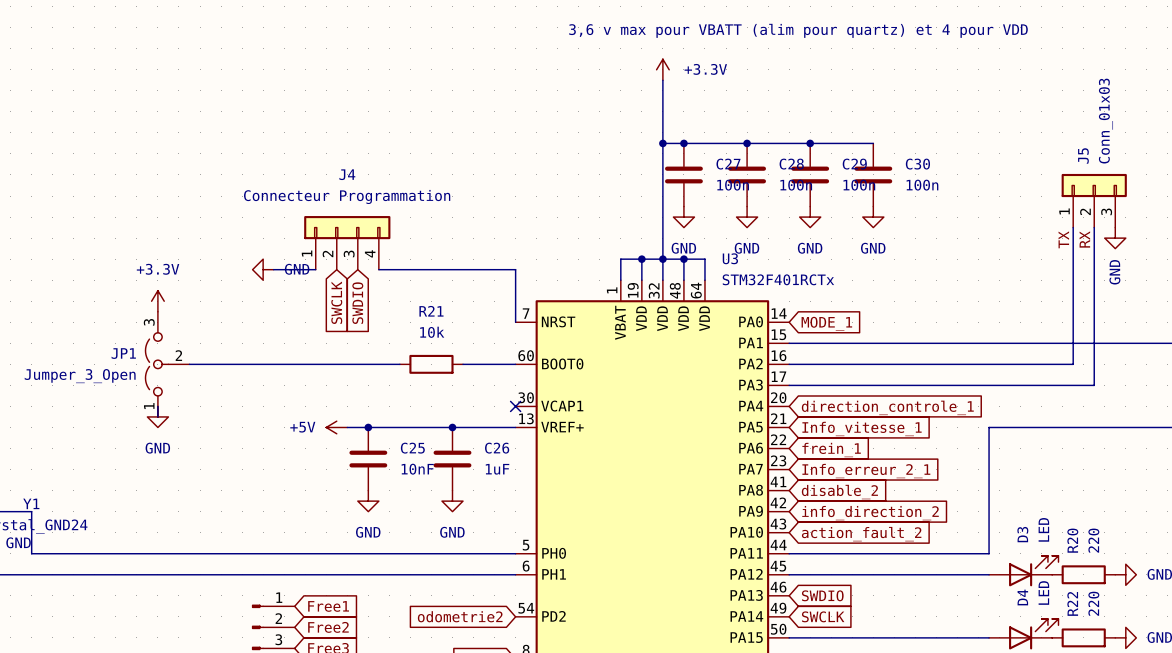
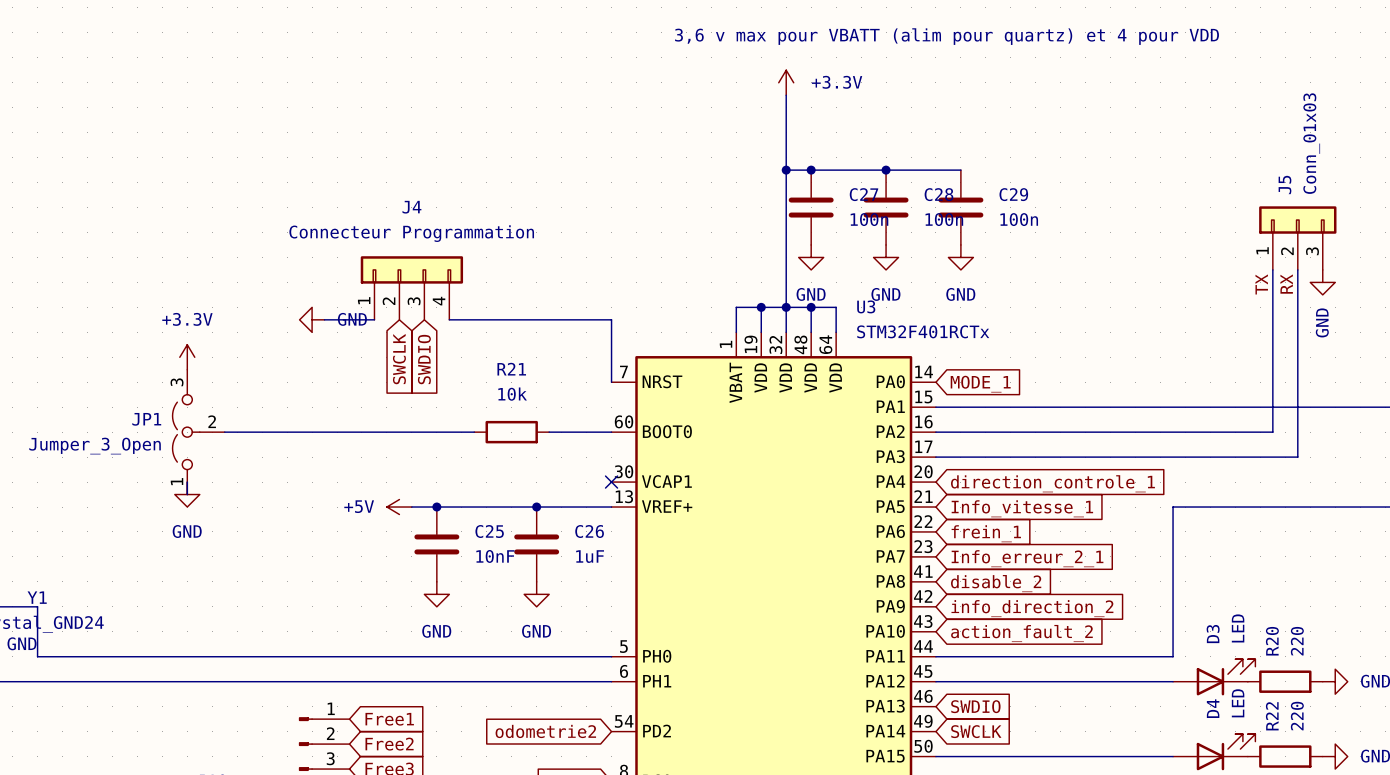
wire: (810, 143) (873, 143) -> none
junction: (810, 143) -> none
C30: 100n (873, 174) -> none
power symbol: GND (873, 217) -> none

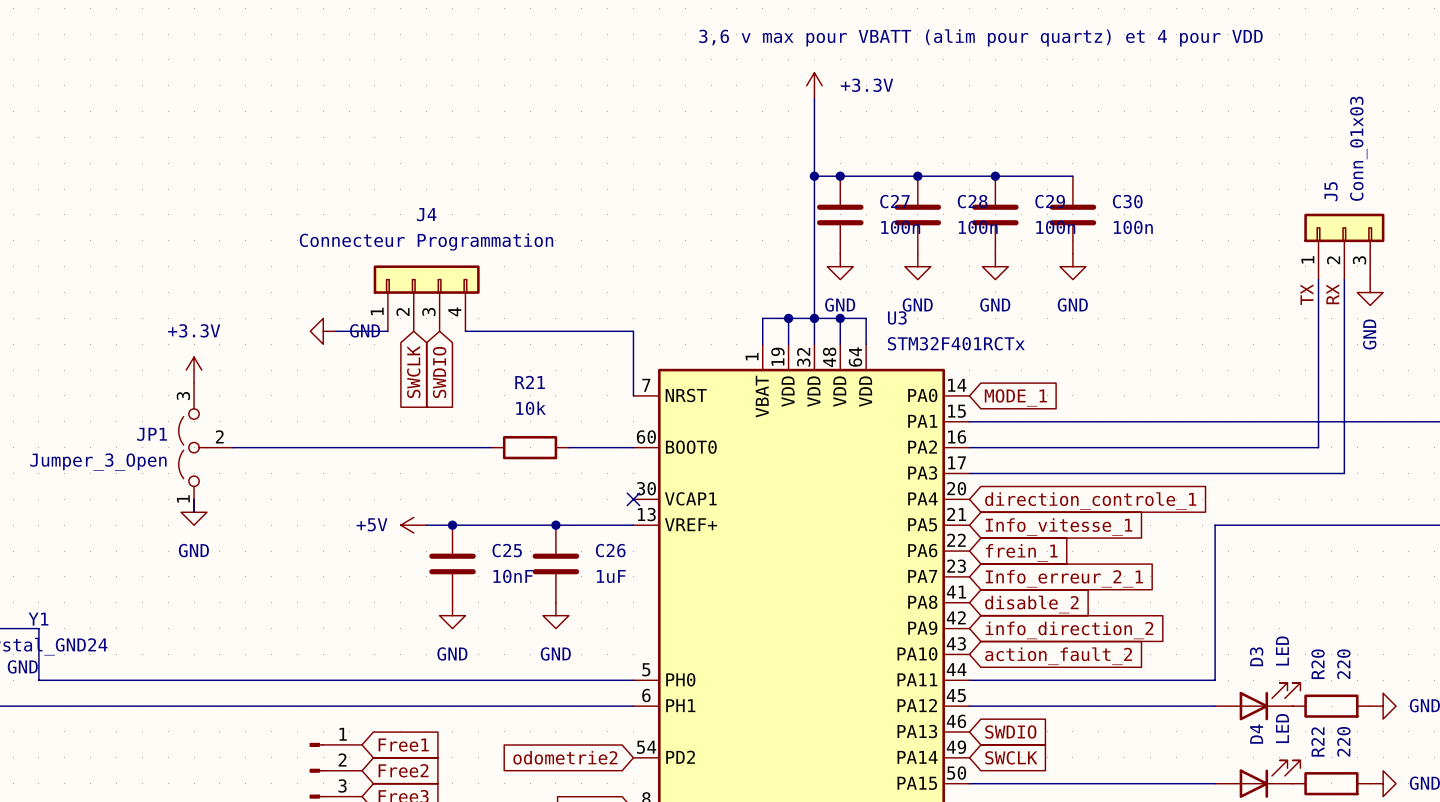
wire: none -> (995, 176) (1072, 176)
junction: none -> (995, 176)
C30: none -> 100n (1072, 214)
power symbol: none -> GND (1072, 266)

